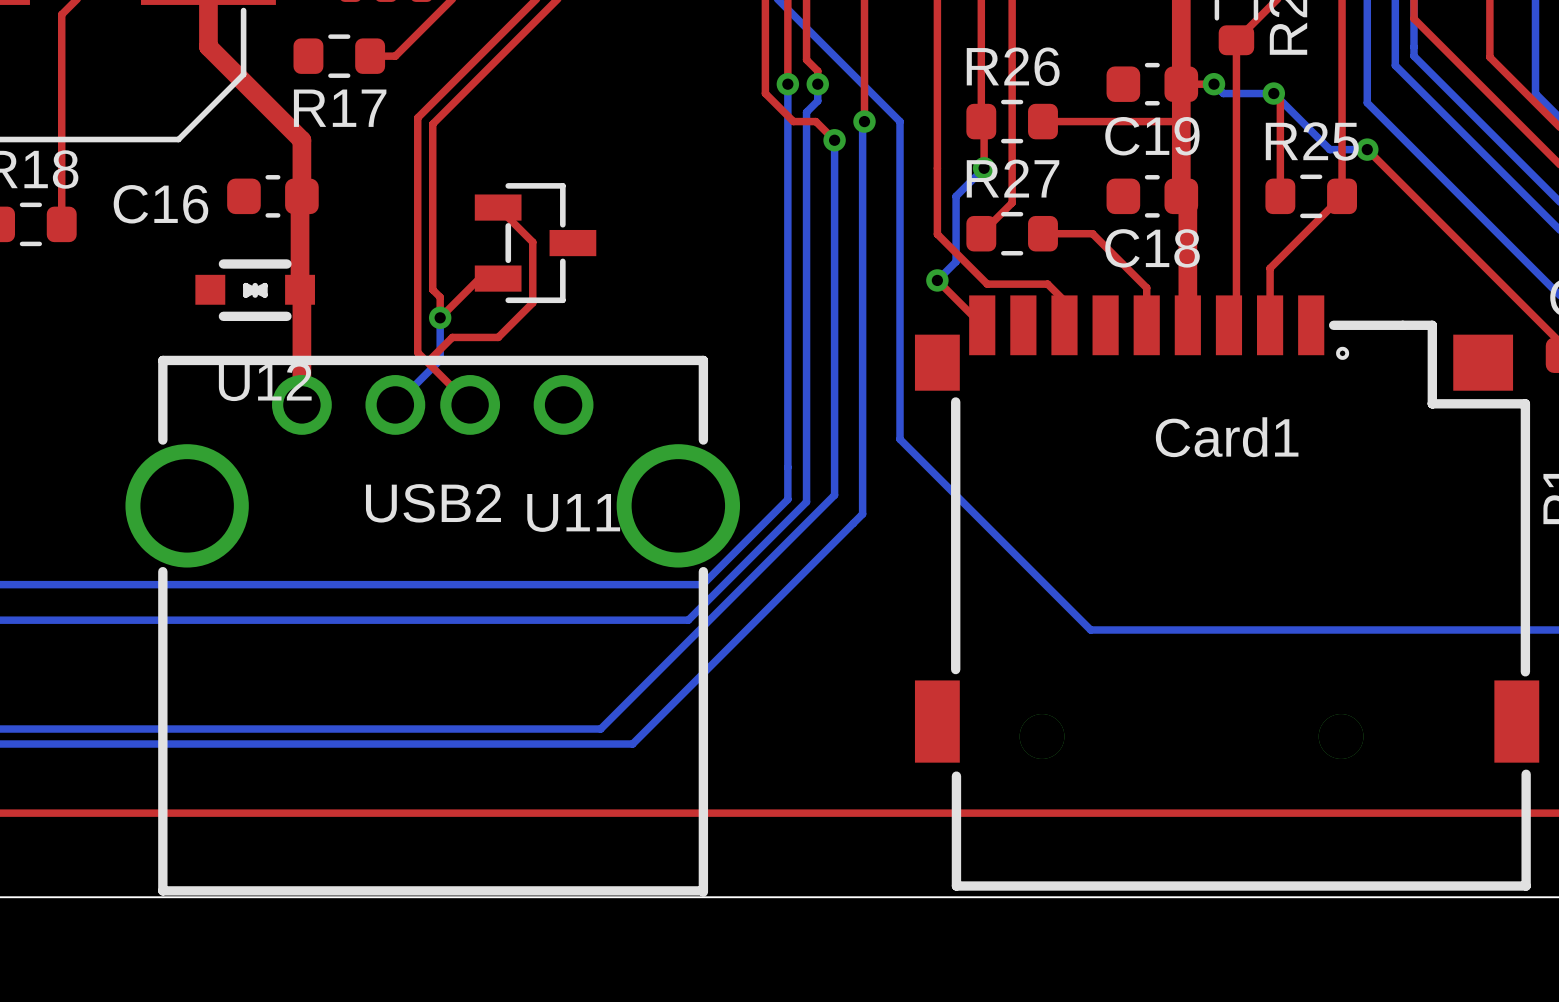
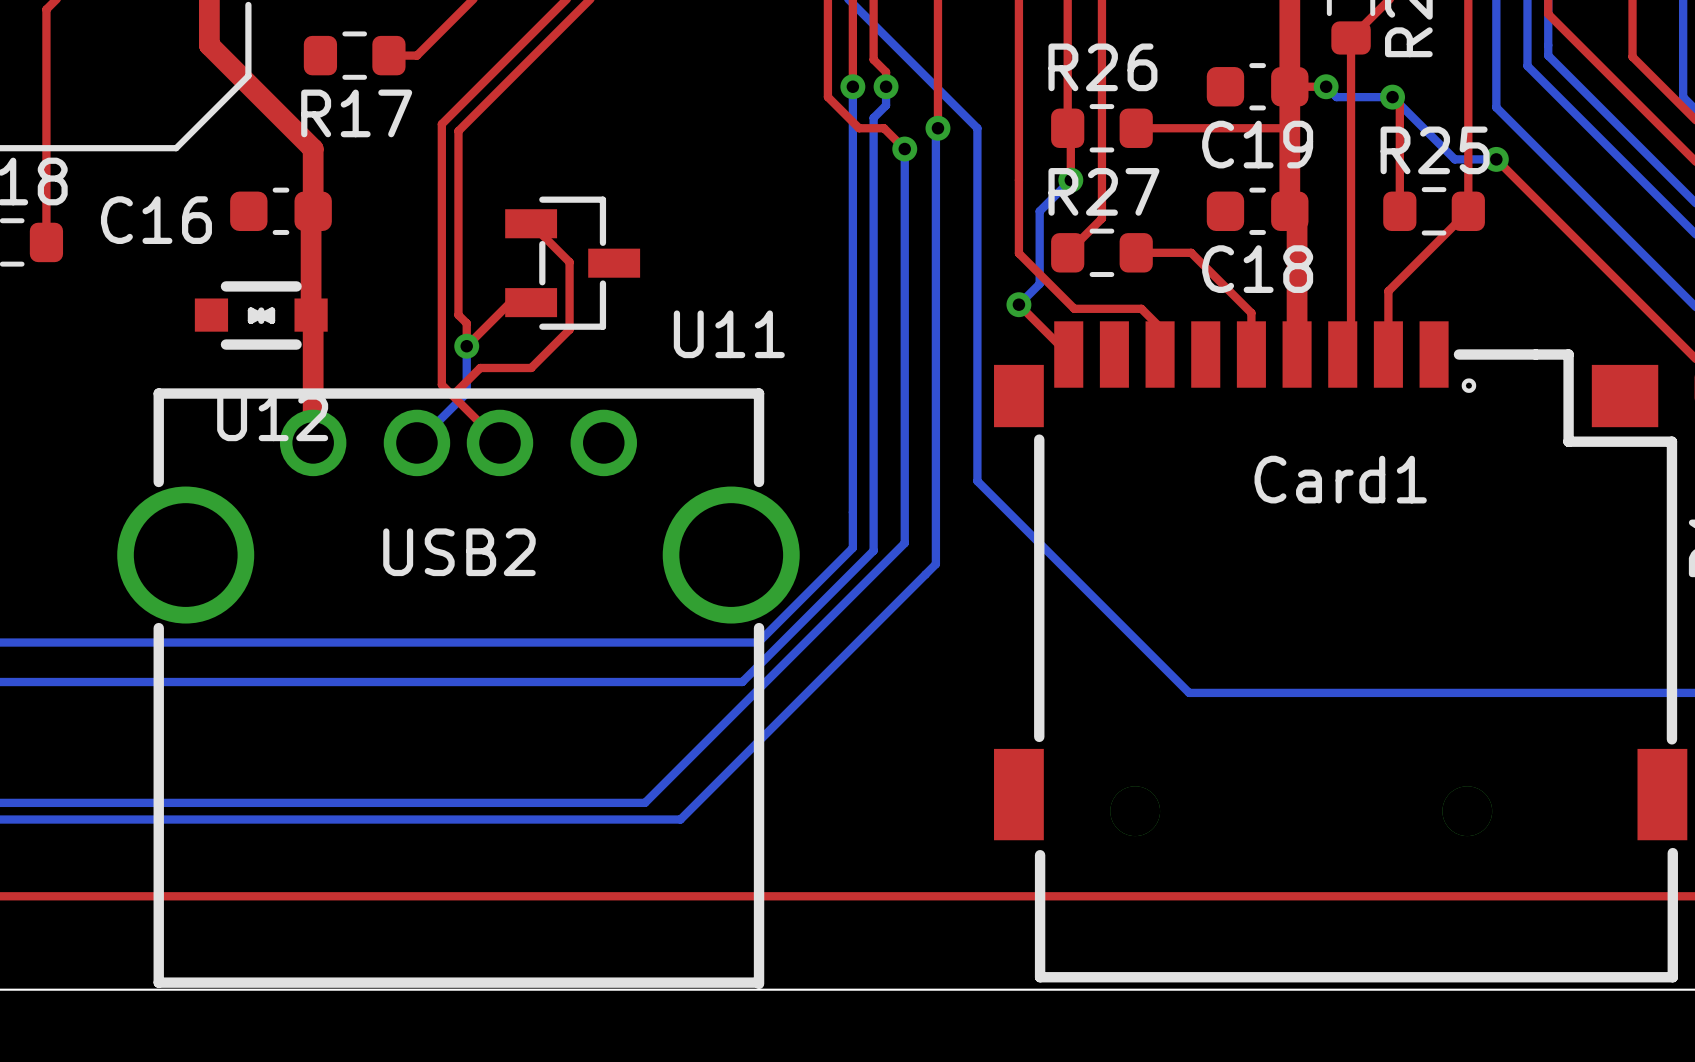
U11 name position: U11 (573, 512) -> U11 (729, 334)

